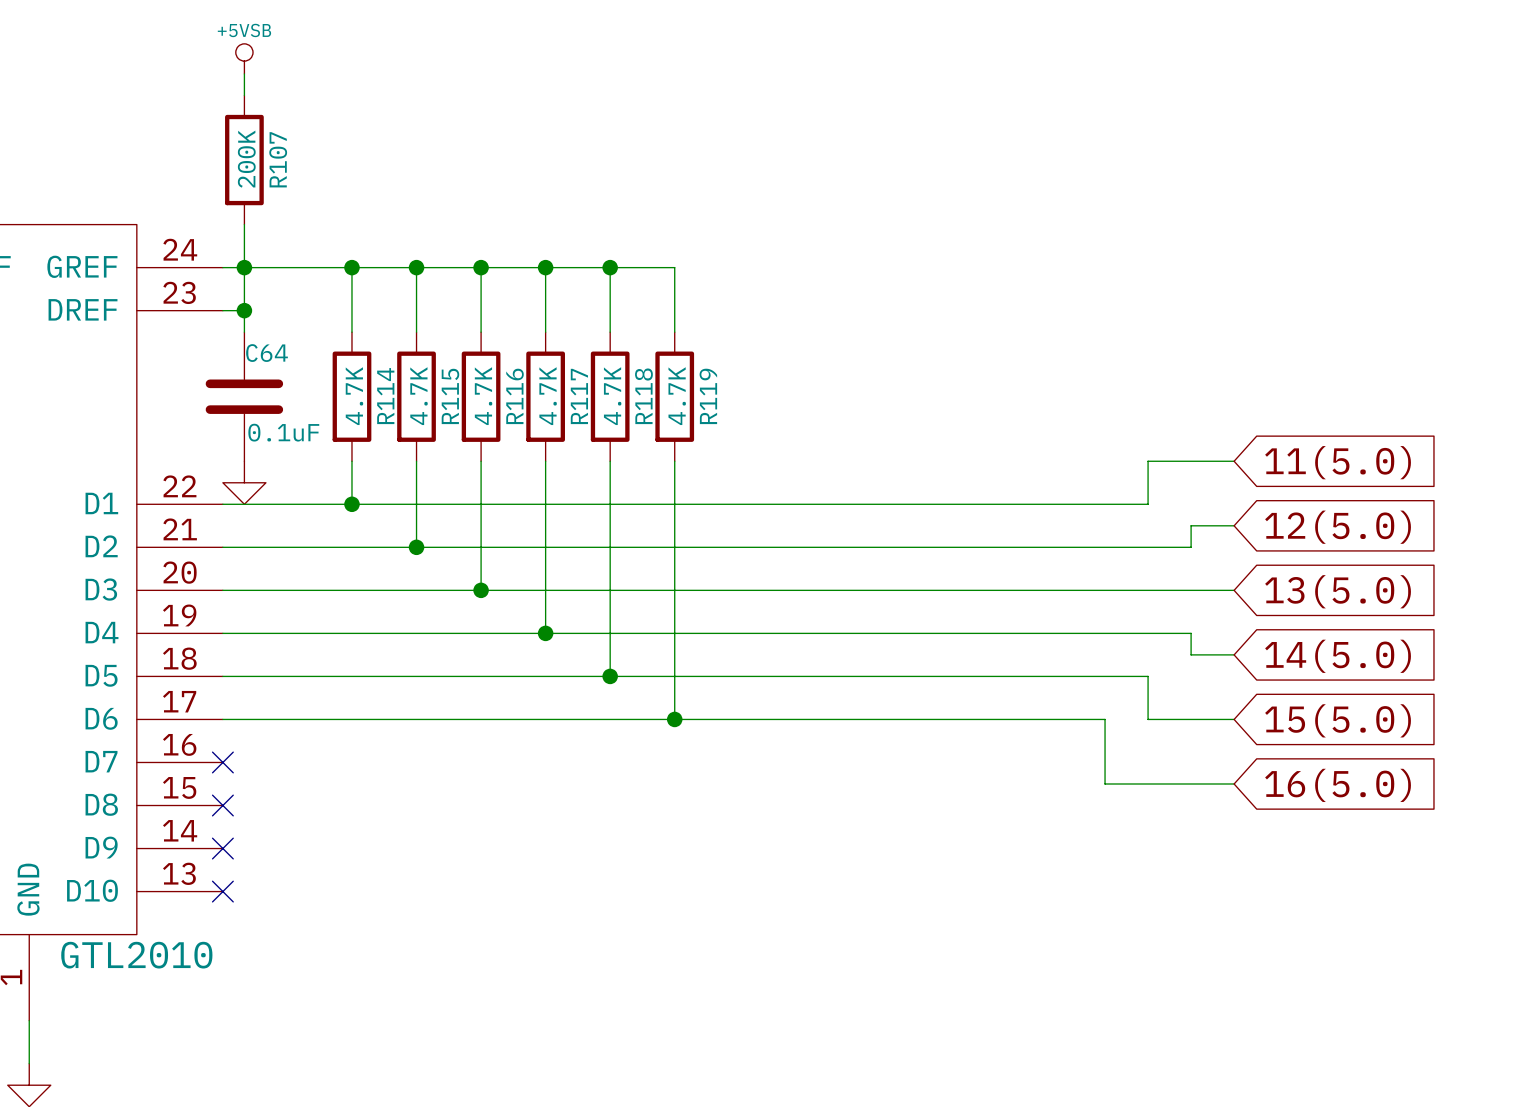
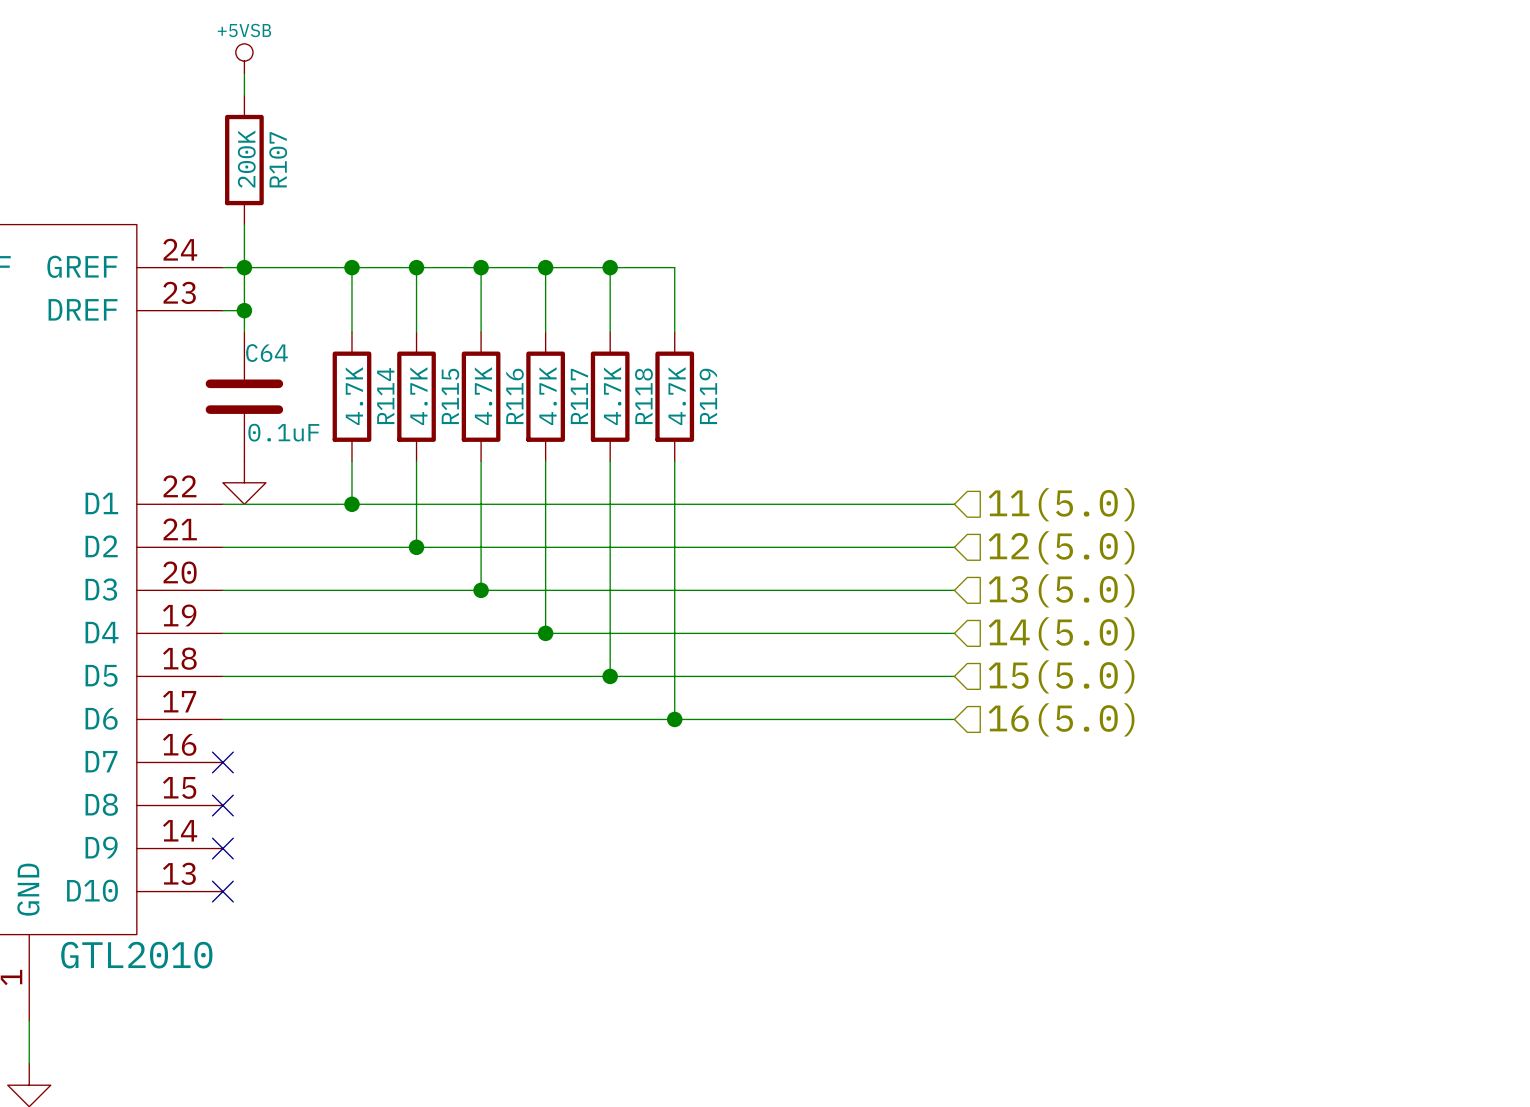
wire: (1234, 461) (1148, 461) (1148, 504) (954, 504) -> none
global label: 11(5.0) (1338, 462) -> none
hierarchical label: none -> 11(5.0) (1061, 504)
wire: (1234, 525) (1191, 525) (1191, 547) (954, 547) -> none
global label: 12(5.0) (1338, 527) -> none
hierarchical label: none -> 12(5.0) (1061, 547)
wire: (954, 590) (1234, 590) -> none
hierarchical label: none -> 13(5.0) (1061, 590)
global label: 13(5.0) (1338, 591) -> none
wire: (954, 633) (1191, 633) (1191, 654) (1234, 654) -> none
hierarchical label: none -> 14(5.0) (1061, 633)
global label: 14(5.0) (1338, 656) -> none
wire: (954, 676) (1148, 676) (1148, 719) (1234, 719) -> none
hierarchical label: none -> 15(5.0) (1061, 676)
wire: (954, 719) (1105, 719) (1105, 783) (1234, 783) -> none
hierarchical label: none -> 16(5.0) (1061, 719)
global label: 15(5.0) (1338, 720) -> none
global label: 16(5.0) (1338, 785) -> none

